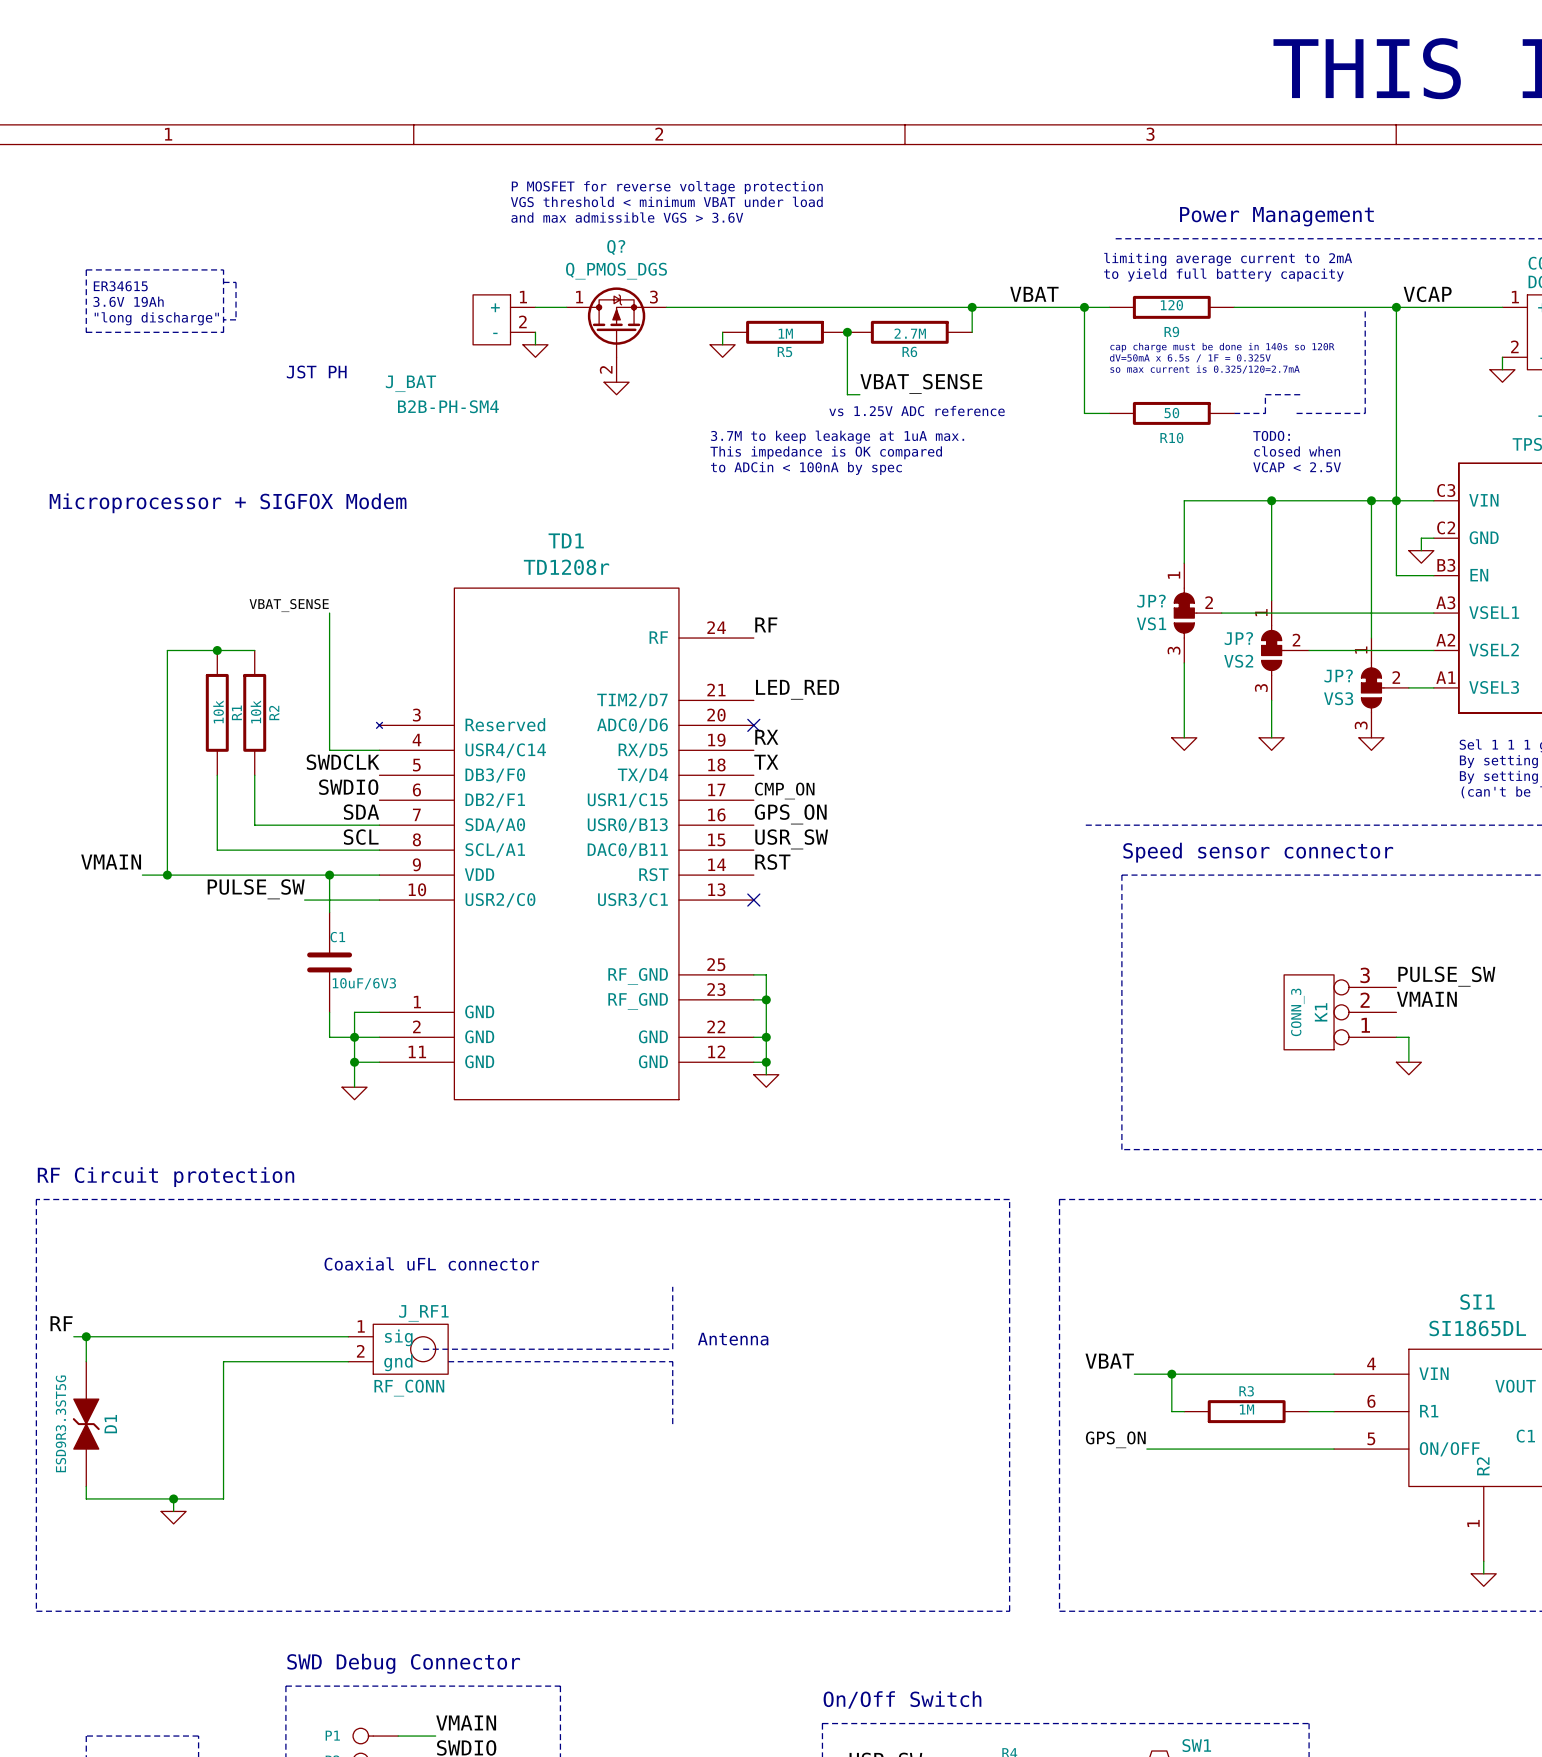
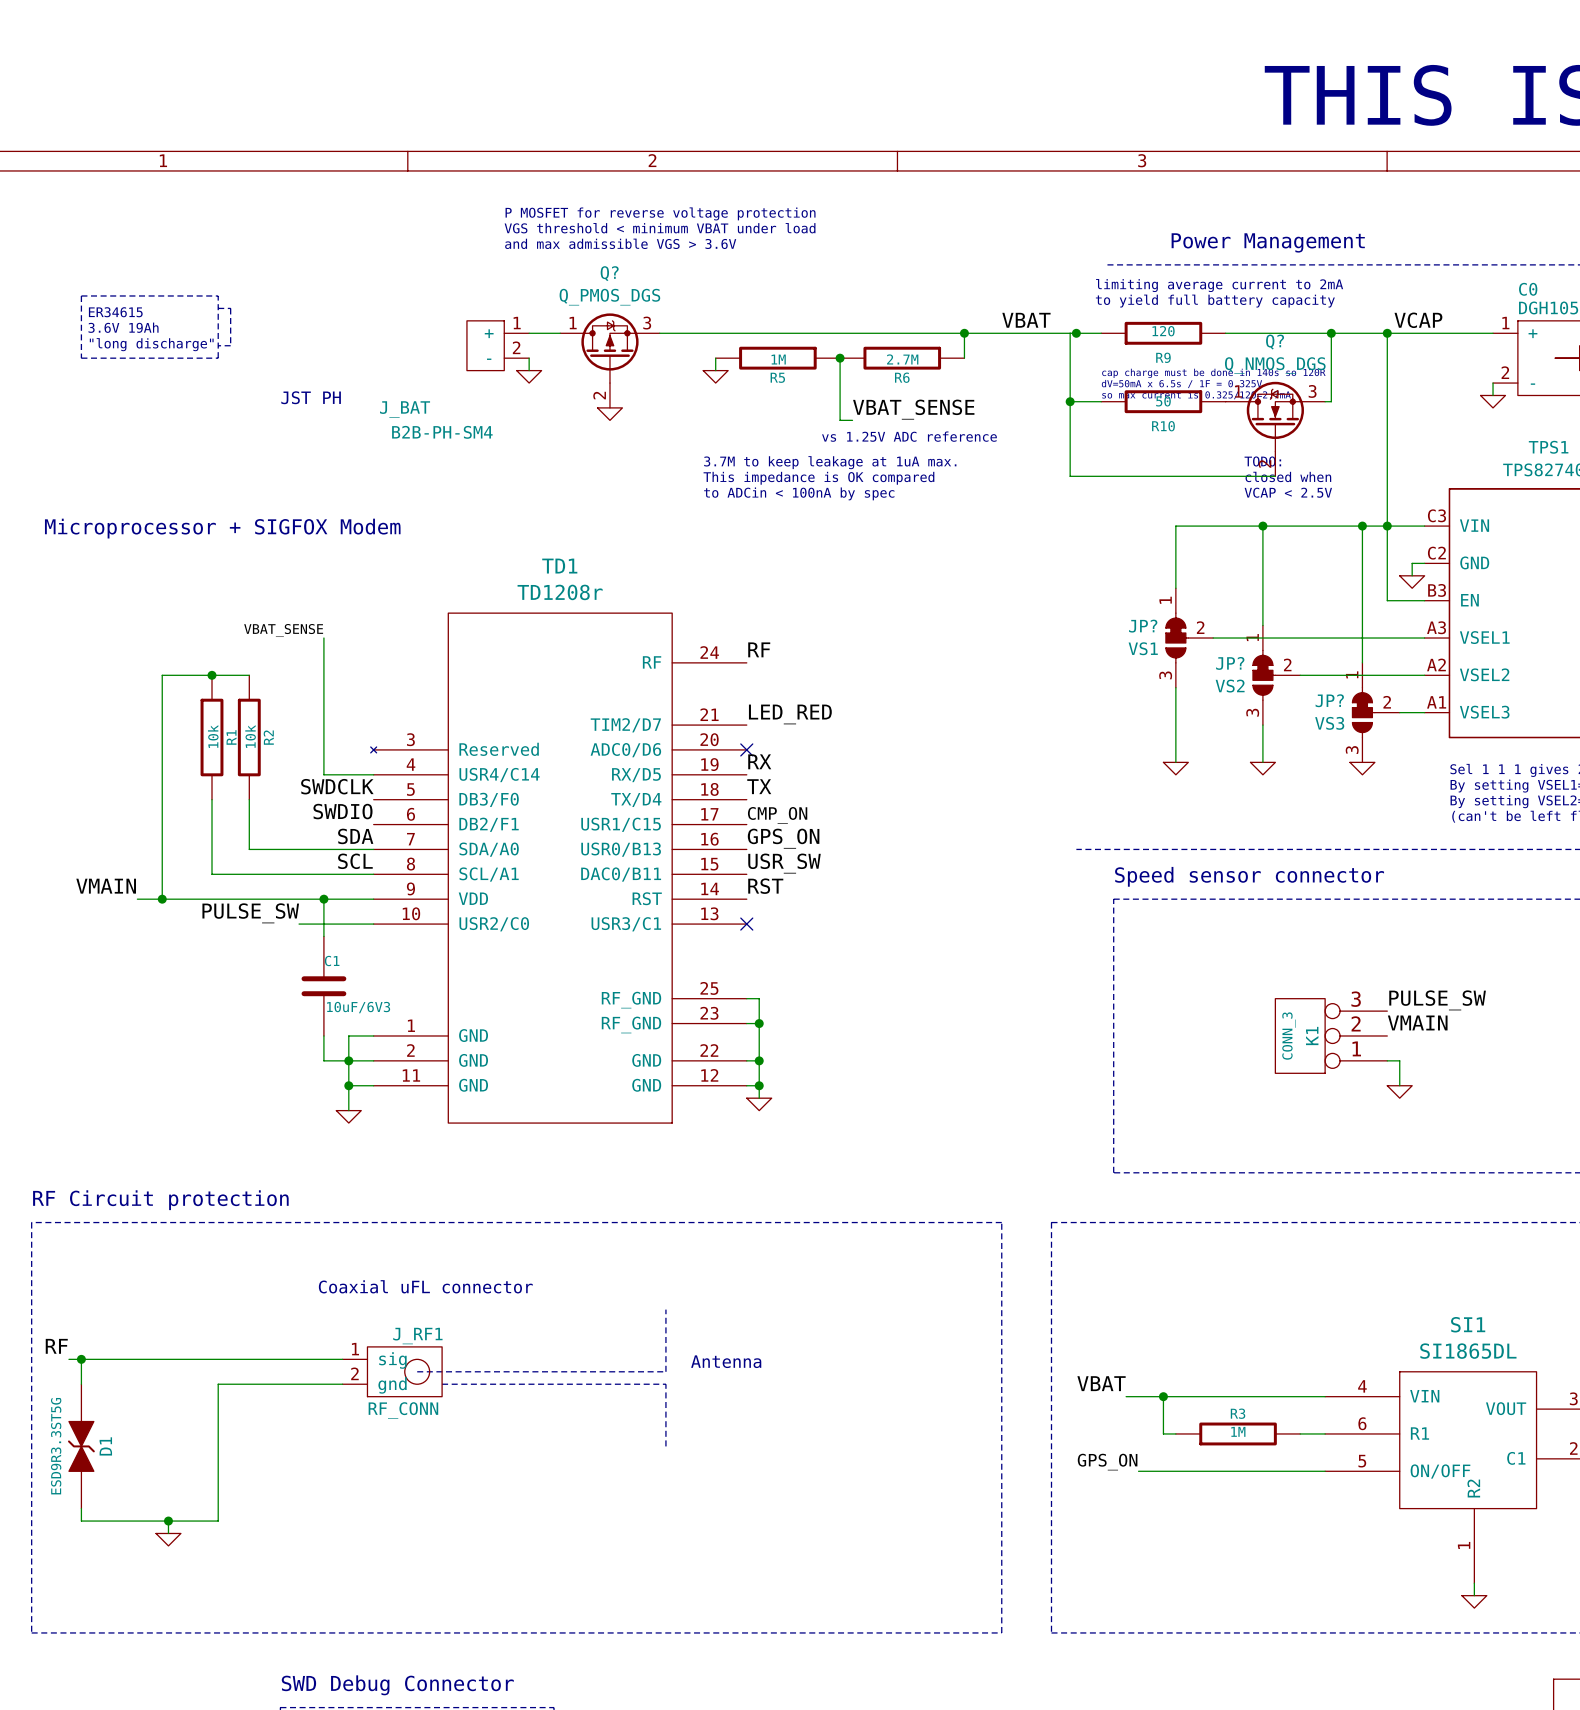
wire: none -> (1070, 333) (1070, 476) (1275, 476)
wire: (1084, 307) (1084, 413) (1109, 413) -> none
wire: none -> (1331, 333) (1331, 401) (1325, 401)
junction: none -> (1331, 333)
line: (1365, 307) (1365, 413) (1296, 413) -> none
wire: none -> (1070, 401) (1101, 401)
junction: none -> (1070, 401)
line: (1302, 394) (1265, 394) (1265, 413) (1234, 413) -> none
Q?: none -> Q_NMOS_DGS (1275, 429)
R10 position: (1171, 413) -> (1163, 401)

